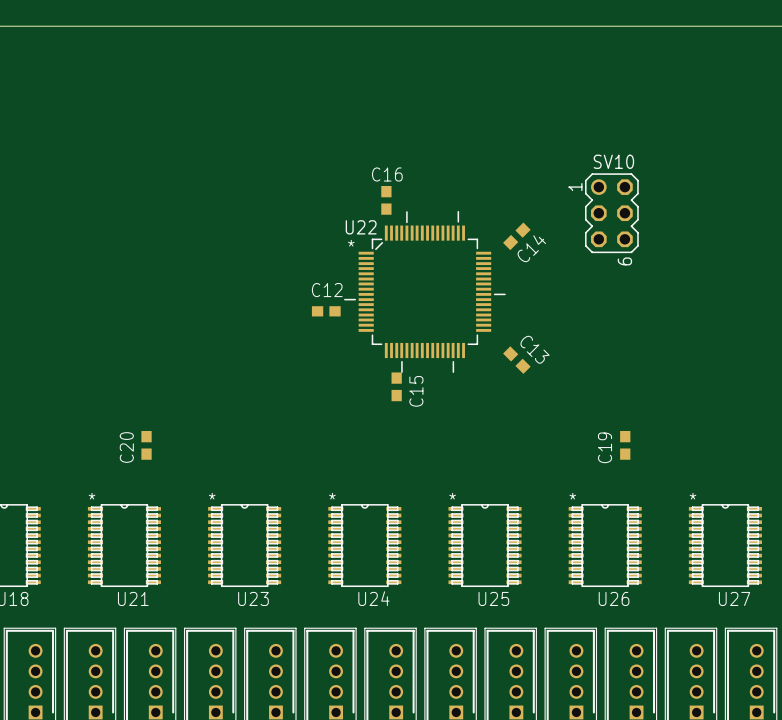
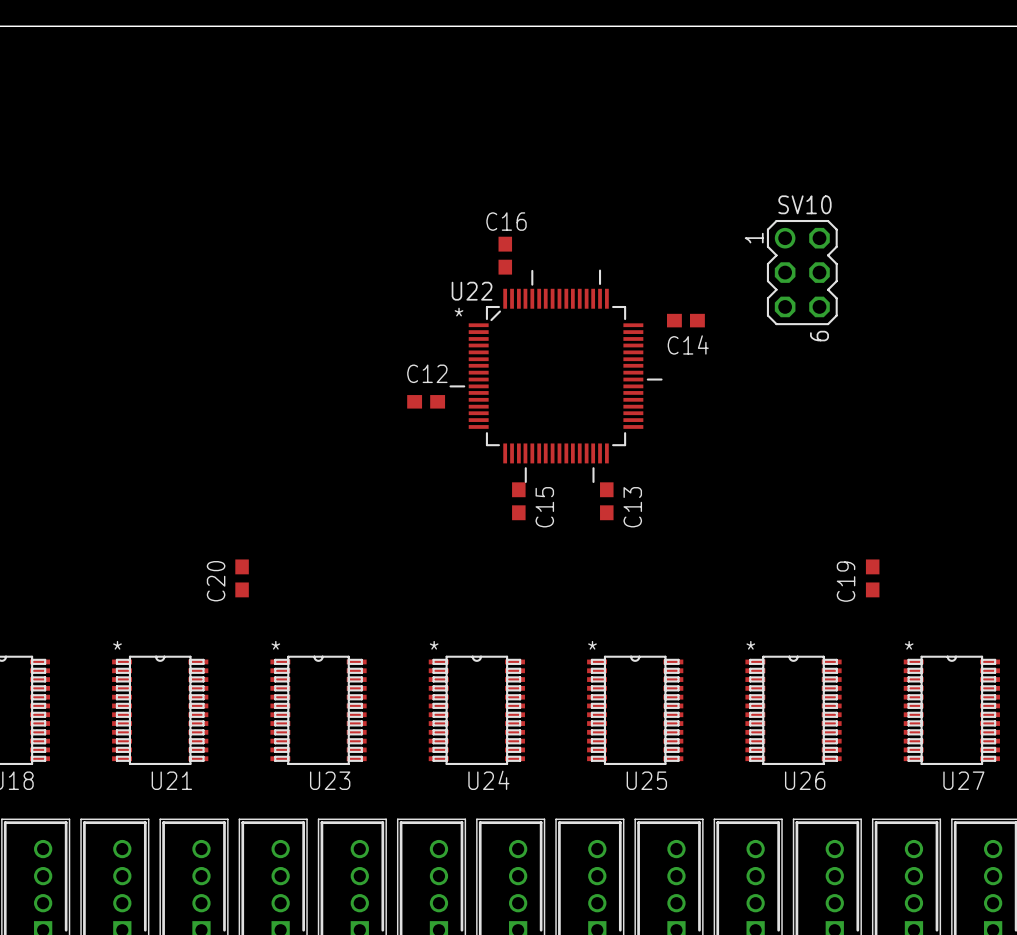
C14 rotation: 0° (516, 236) -> 45° clockwise (685, 320)
C13 rotation: 0° (516, 360) -> 45° clockwise (606, 501)
C13 position: (516, 360) -> (606, 501)
C20 position: (146, 445) -> (242, 578)
C19 position: (625, 445) -> (872, 578)

